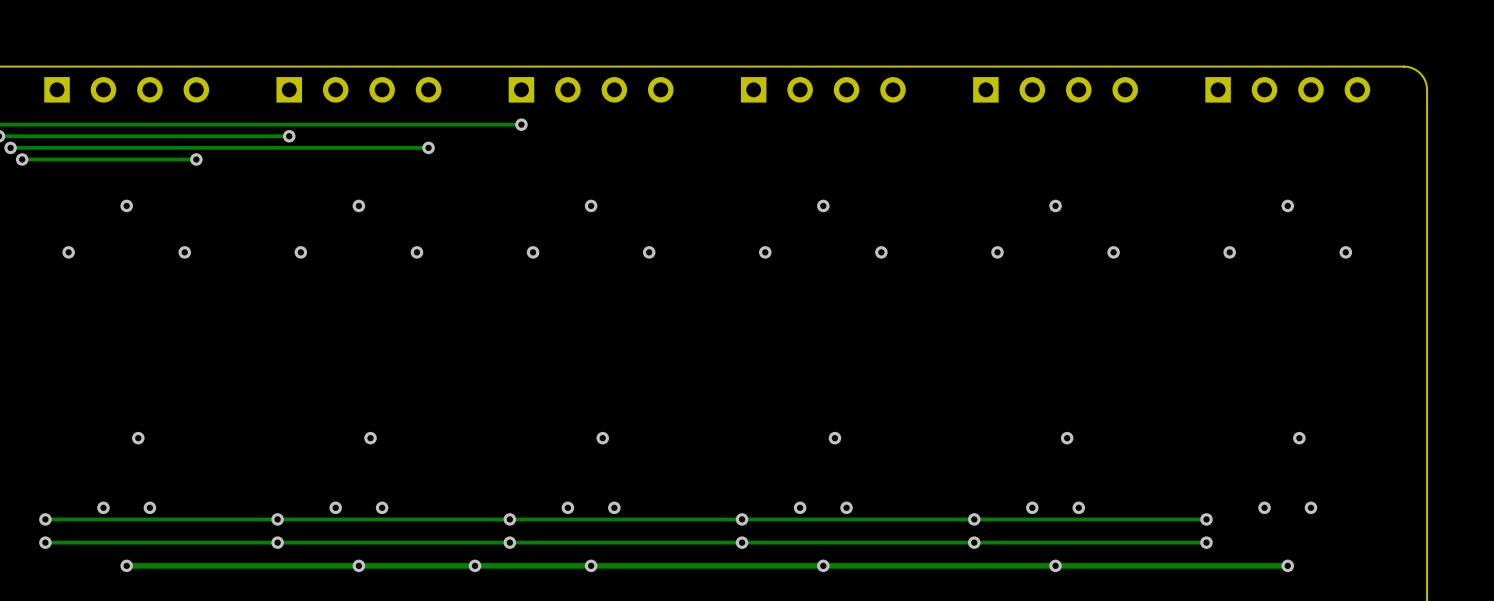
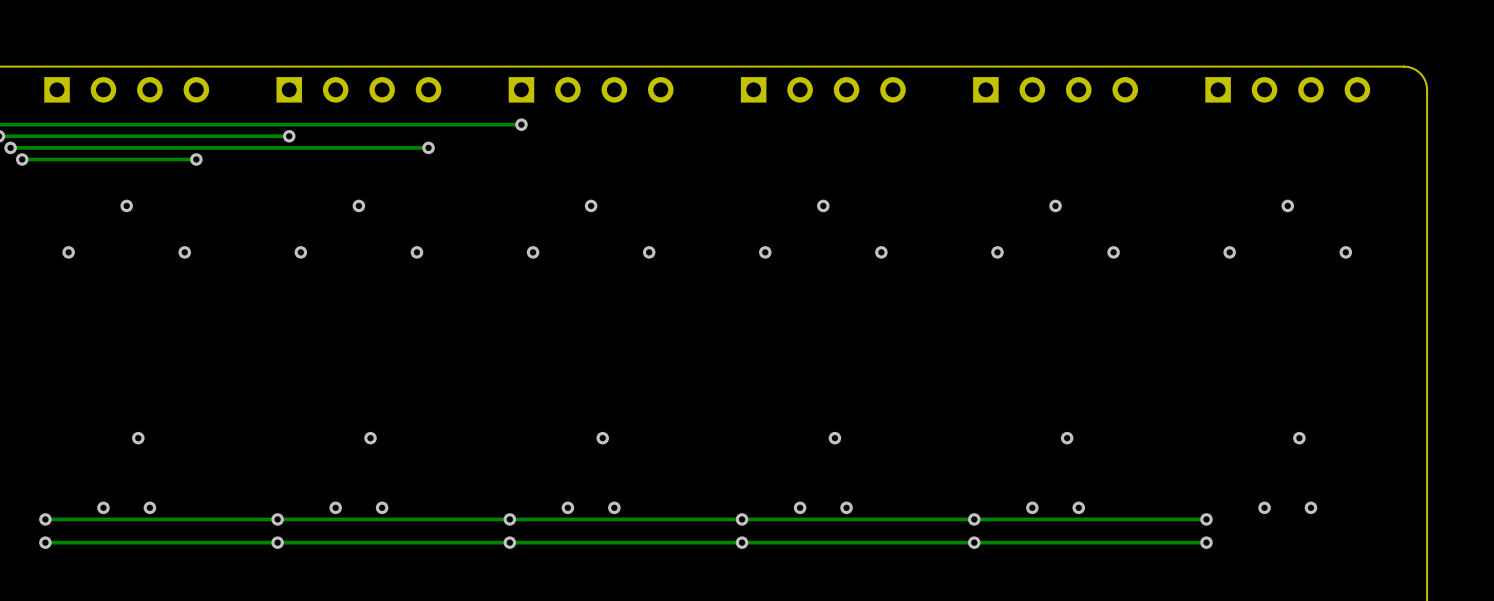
via: (126, 565) -> none
via: (358, 565) -> none
via: (475, 565) -> none
via: (591, 565) -> none
via: (823, 565) -> none
via: (1055, 565) -> none
track: (1287, 565) (126, 565) -> none
via: (1287, 565) -> none

